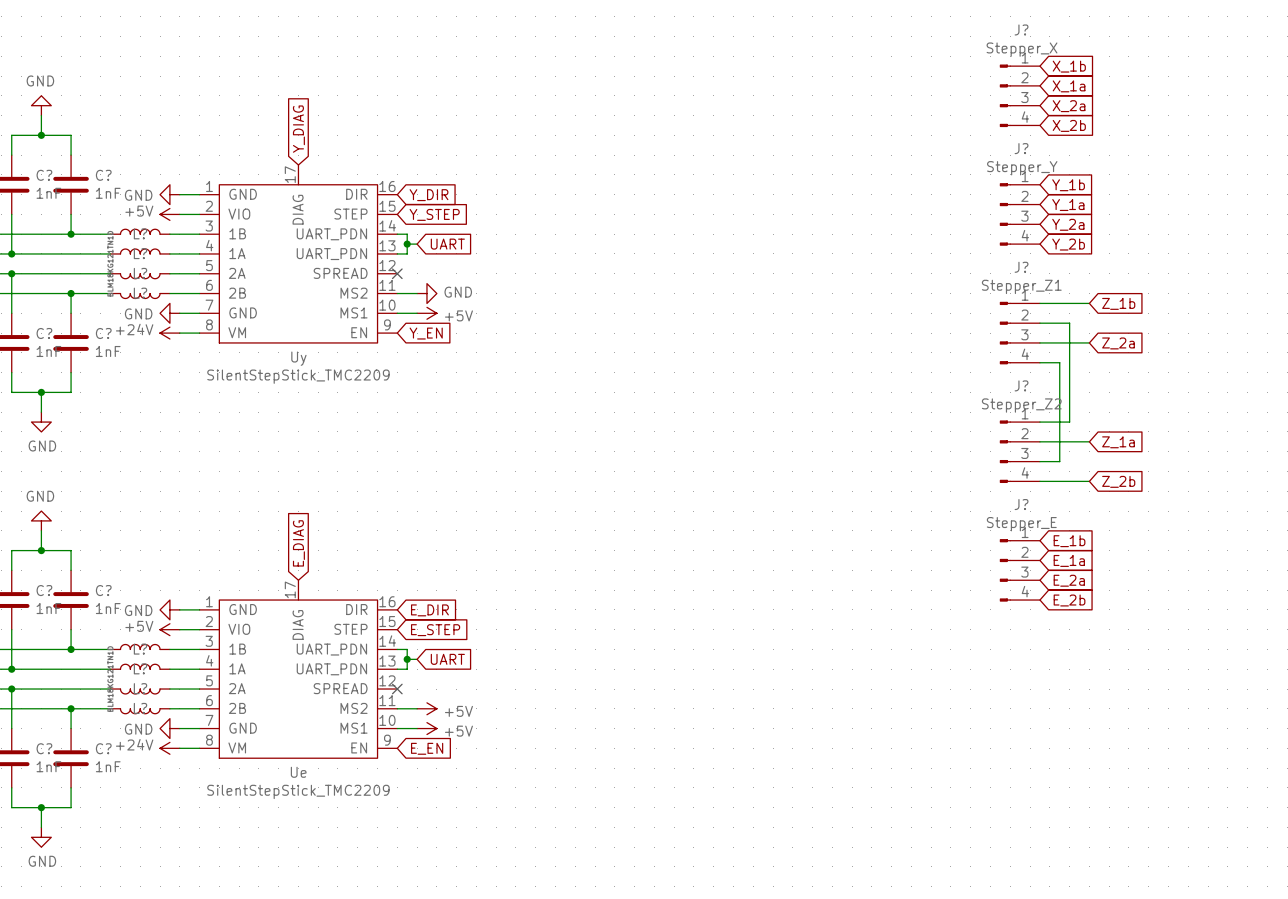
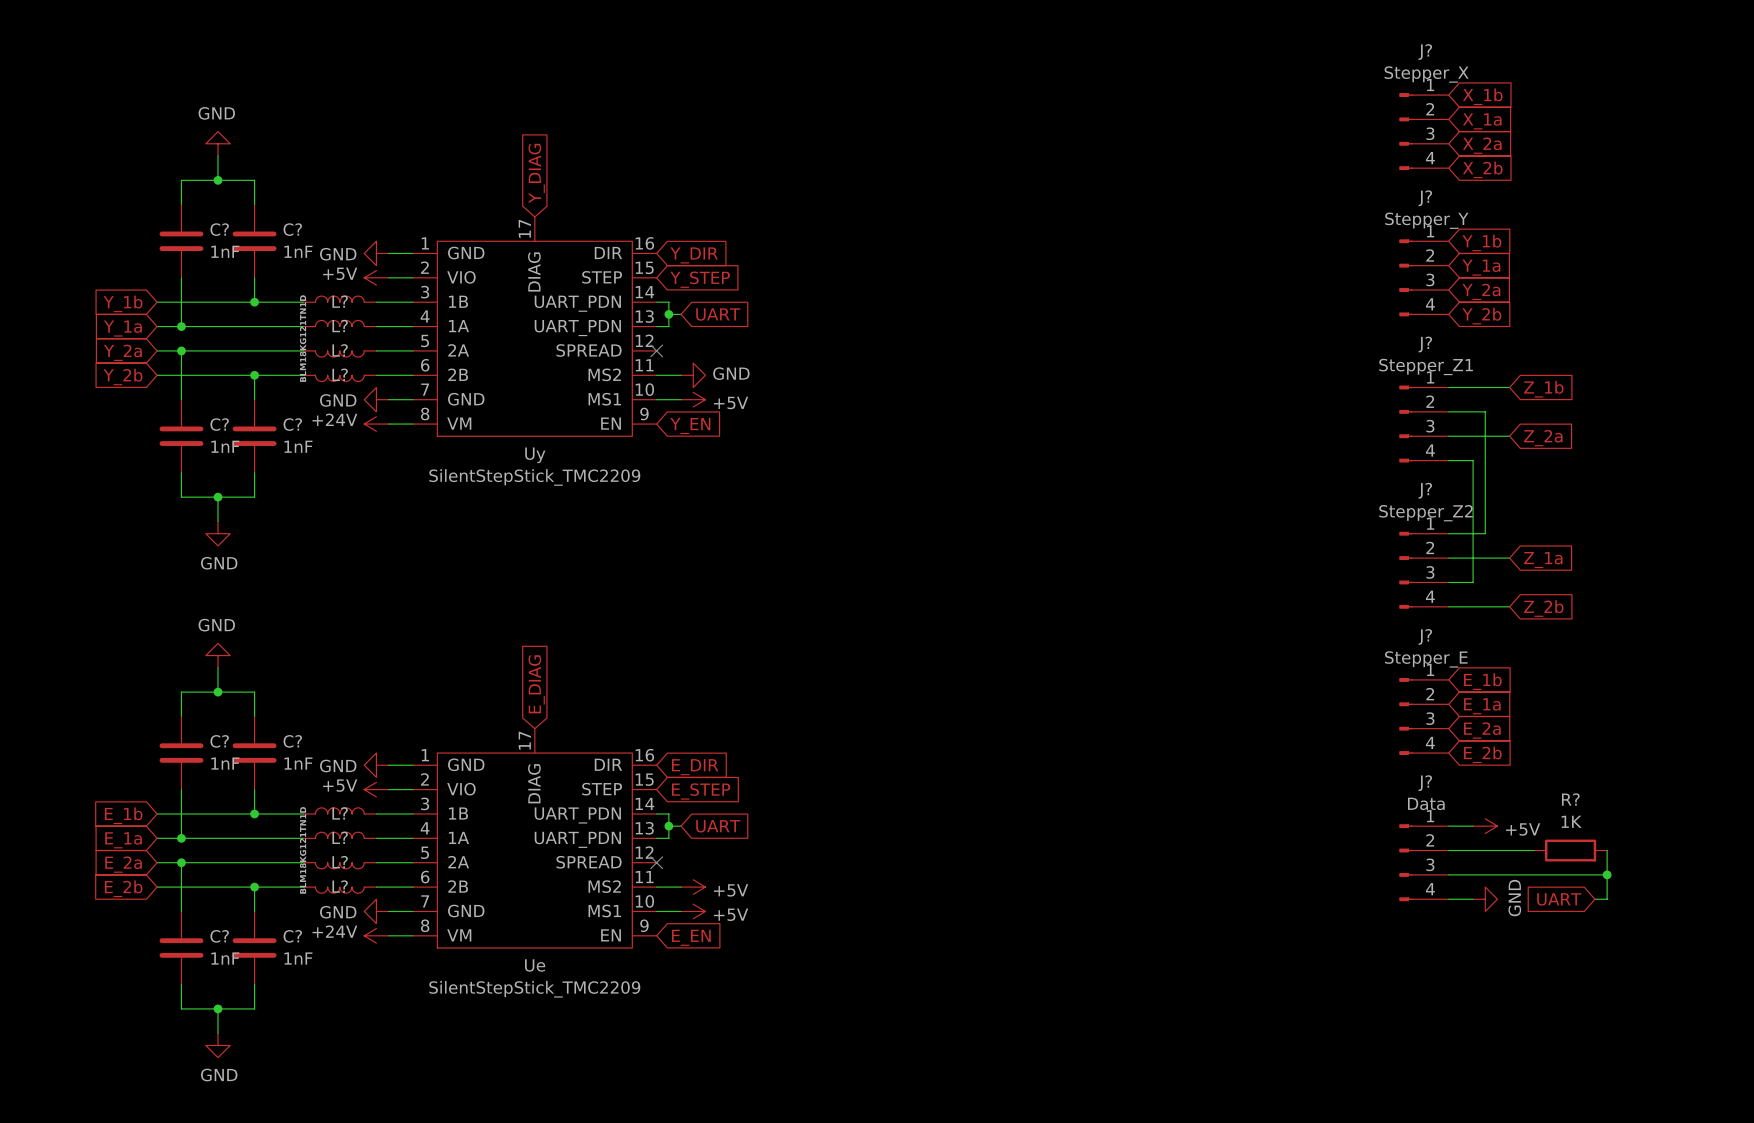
wire: none -> (1448, 826) (1473, 826)
power symbol: none -> +5V (1485, 826)
wire: none -> (1448, 850) (1534, 850)
R?: none -> 1K (1570, 850)
wire: none -> (1607, 850) (1607, 899) (1594, 899)
J?: none -> Data (1423, 862)
wire: none -> (1448, 874) (1607, 874)
junction: none -> (1607, 874)
wire: none -> (1448, 899) (1473, 899)
power symbol: none -> GND (1485, 899)
global label: none -> UART (1559, 899)

